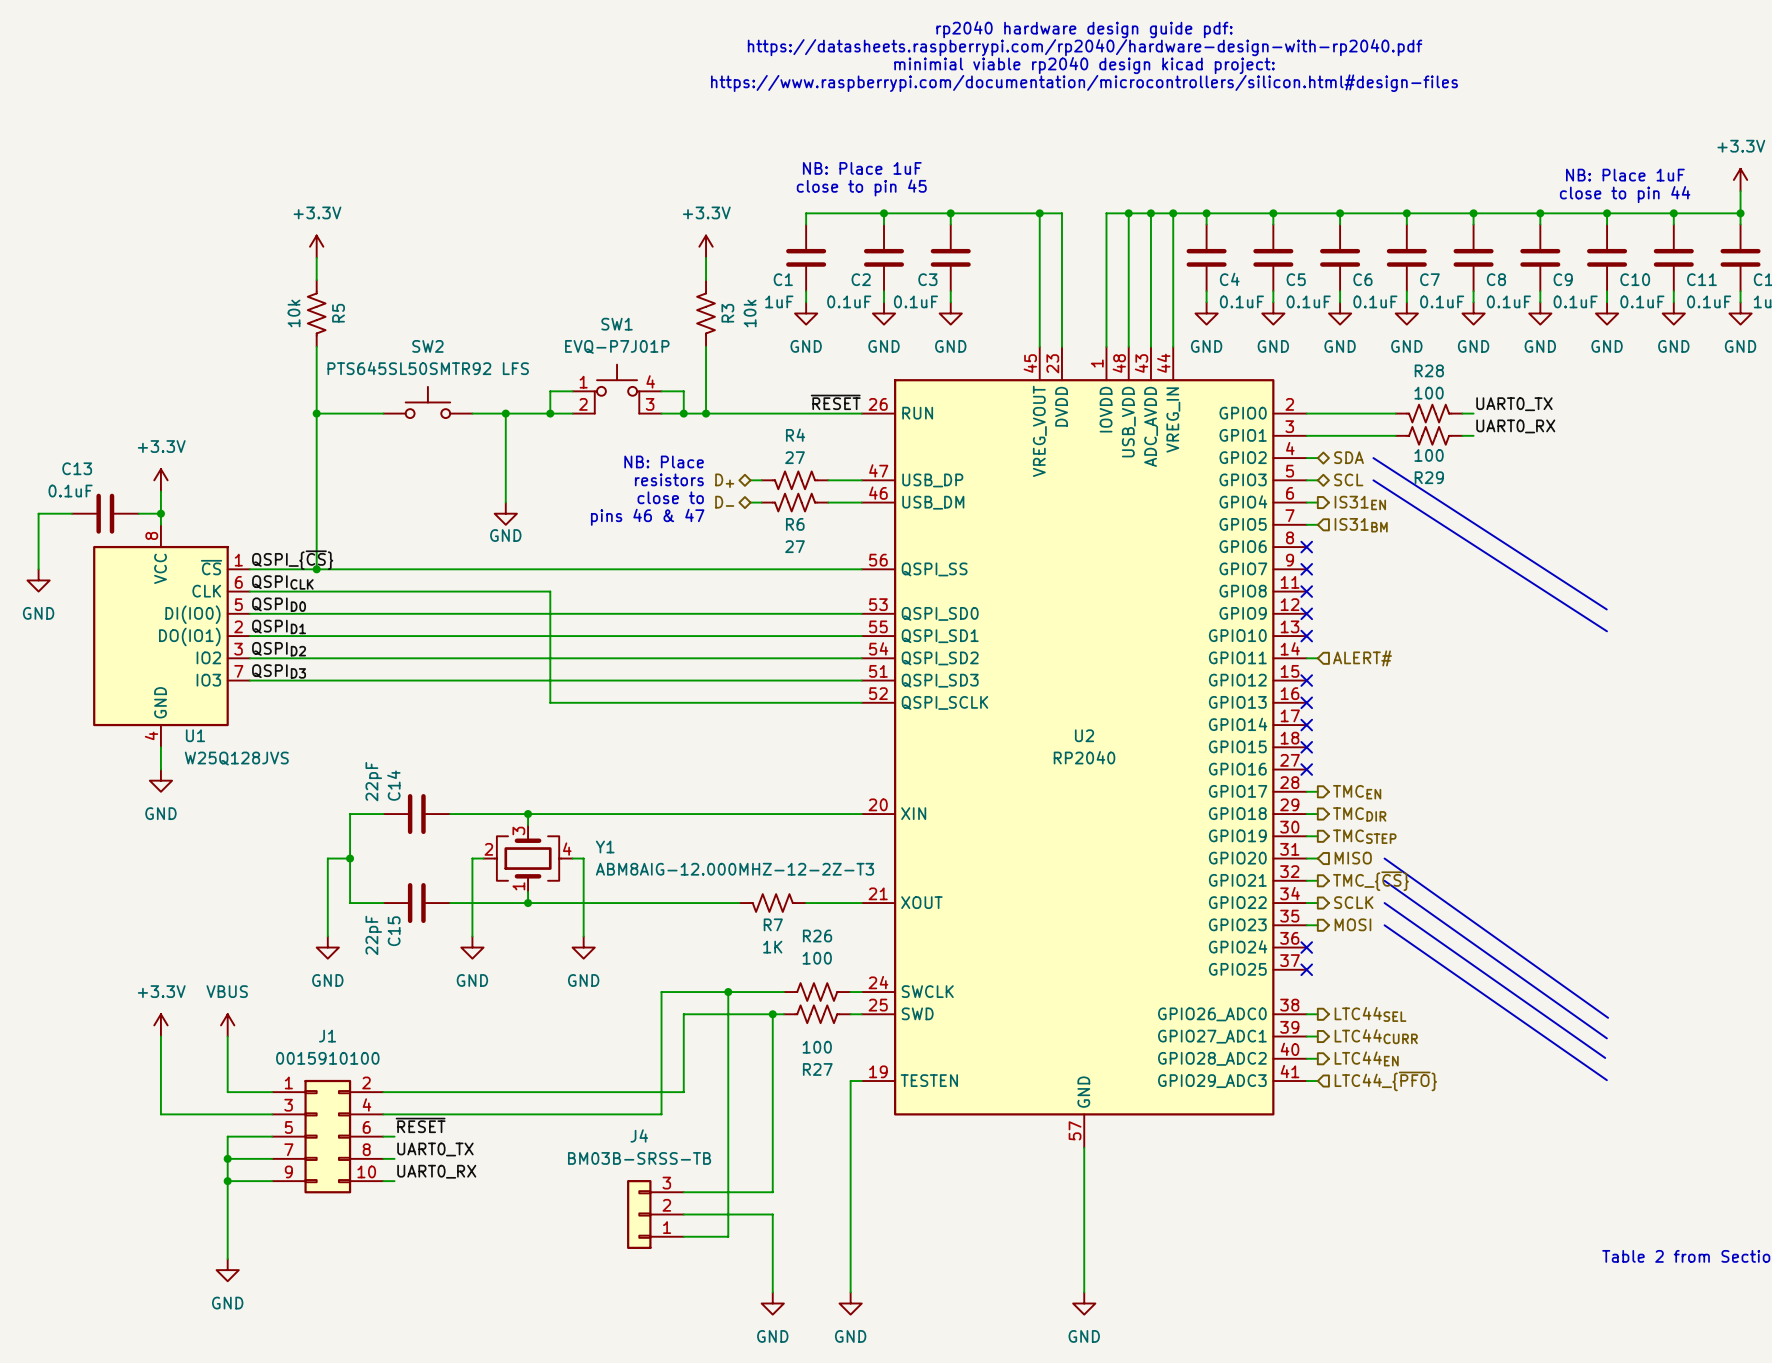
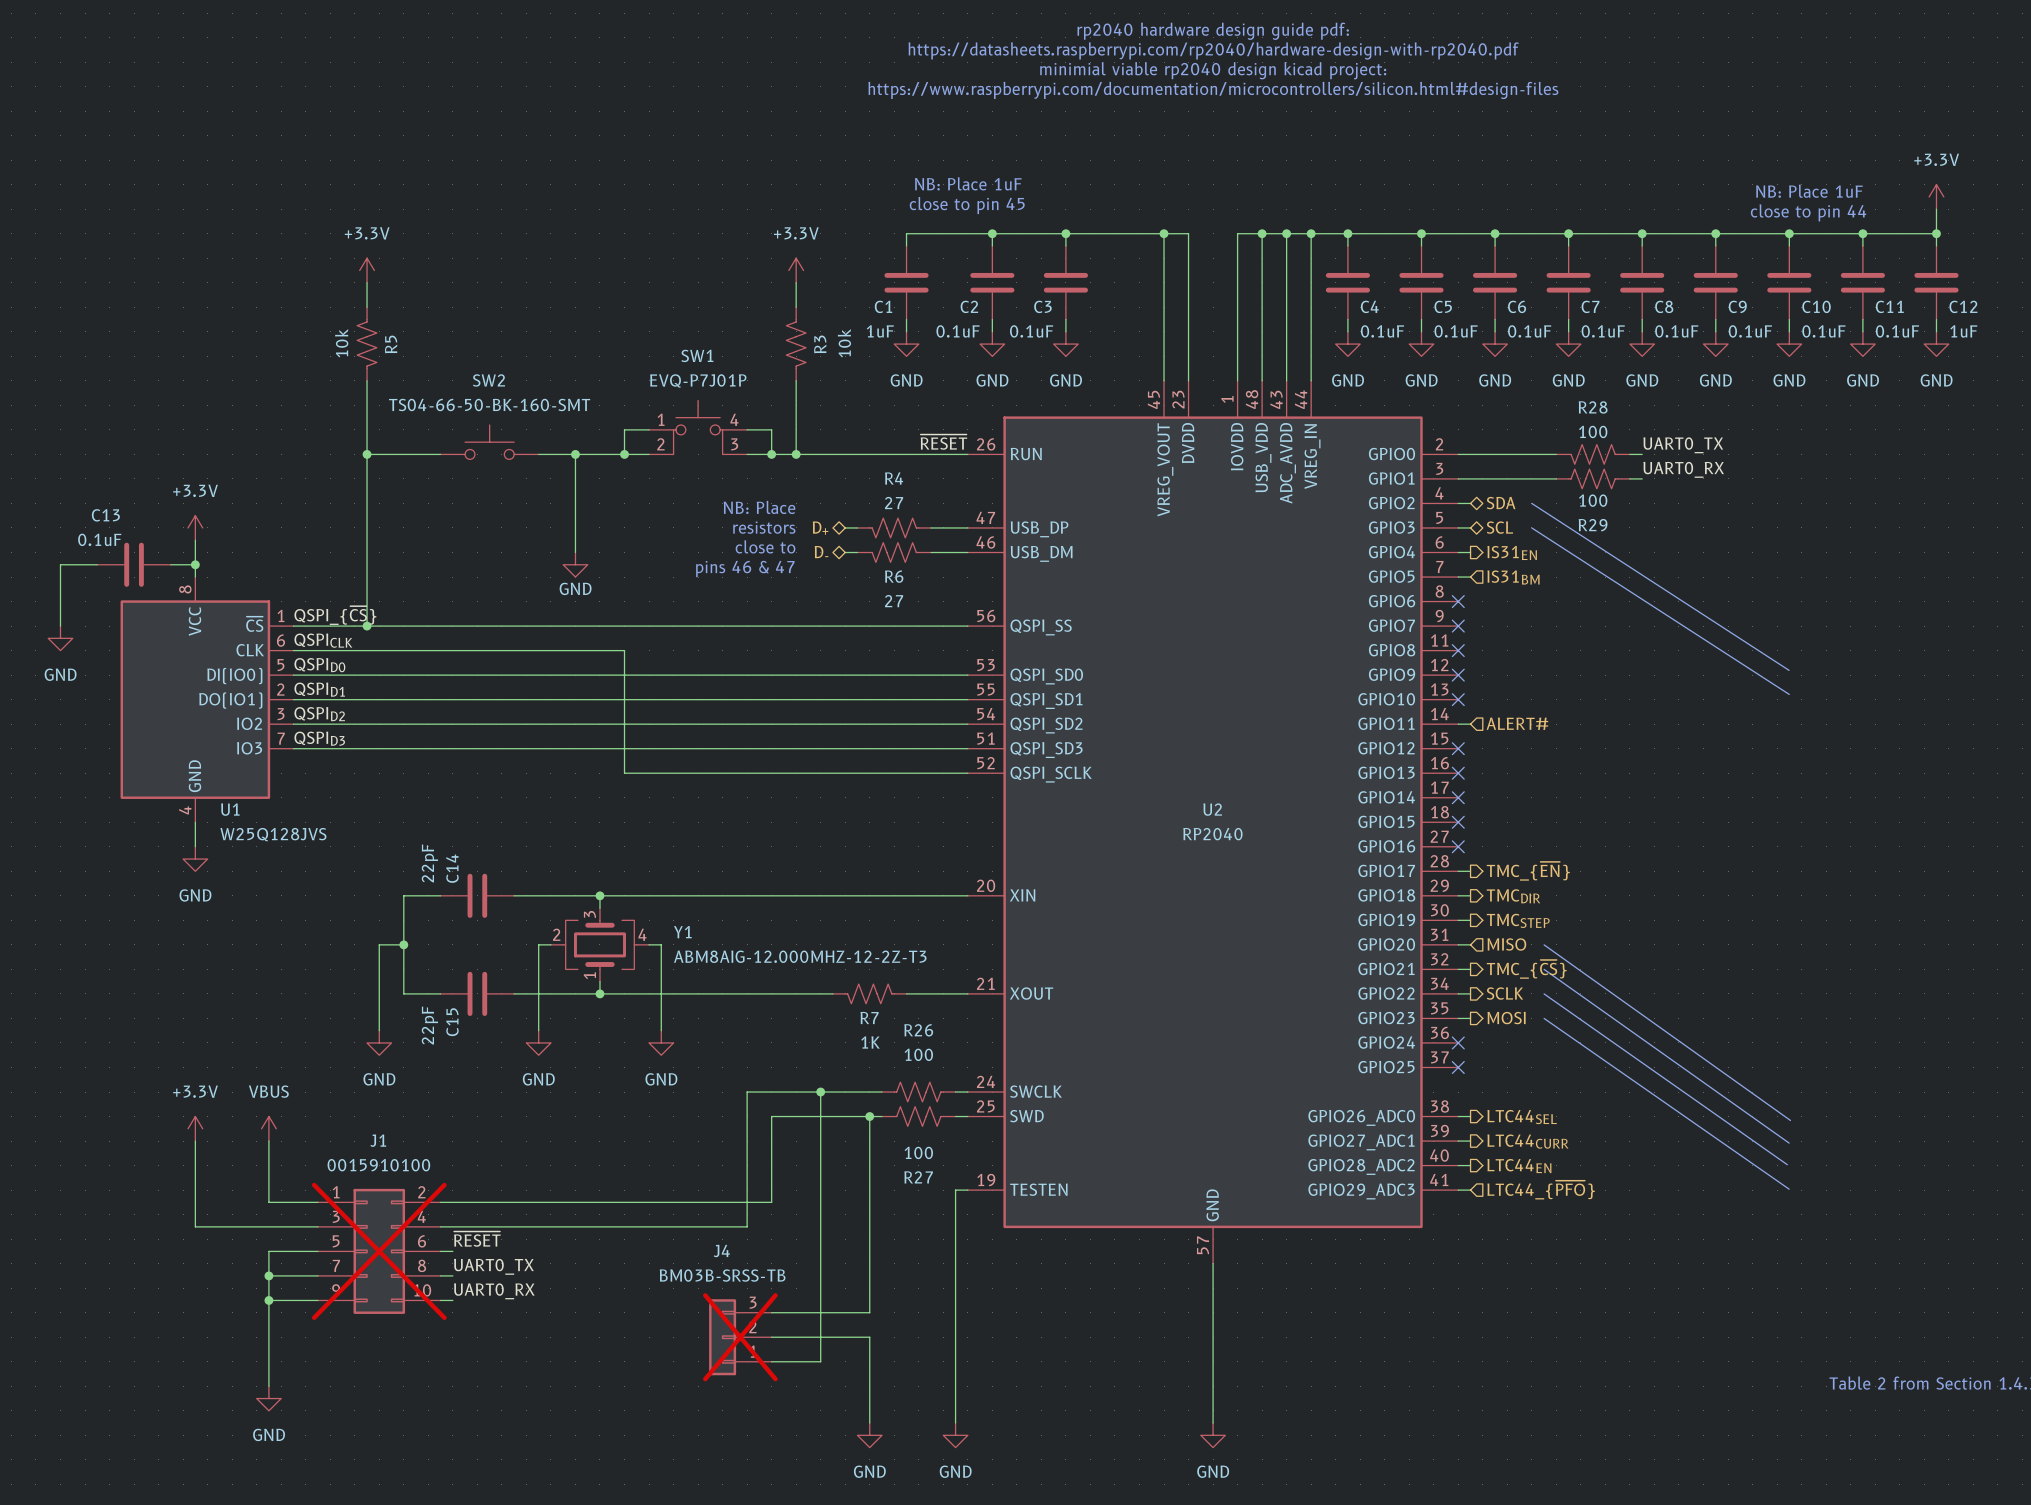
SW2 value: PTS645SL50SMTR92 LFS (428, 368) -> TS04-66-50-BK-160-SMT (489, 404)
hierarchical label: TMCEN (1357, 792) -> TMC_{~{EN}} (1528, 871)
J1 do-not-place cross: none -> (379, 1251)
J4 do-not-place cross: none -> (740, 1337)

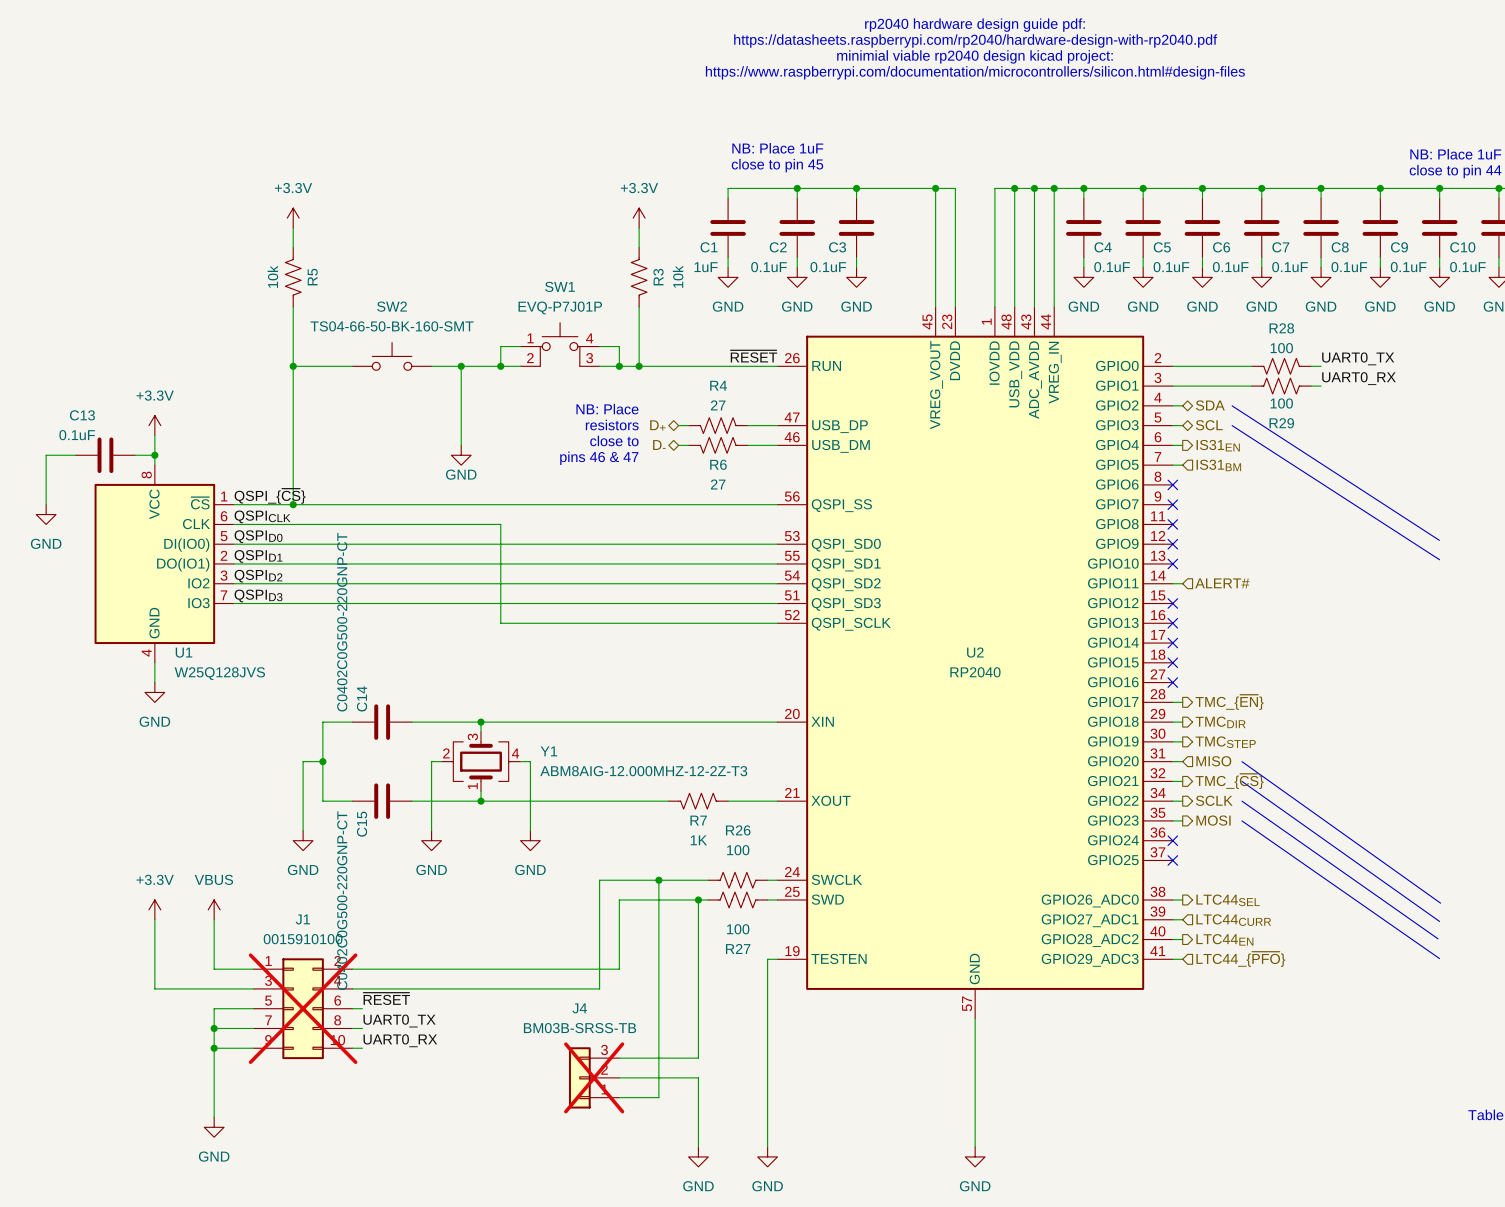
C14 value: 22pF (429, 863) -> C0402C0G500-220GNP-CT (342, 622)
C15 value: 22pF (429, 1025) -> C0402C0G500-220GNP-CT (342, 900)
hierarchical label shape: output (1527, 1141) -> input (1233, 920)

